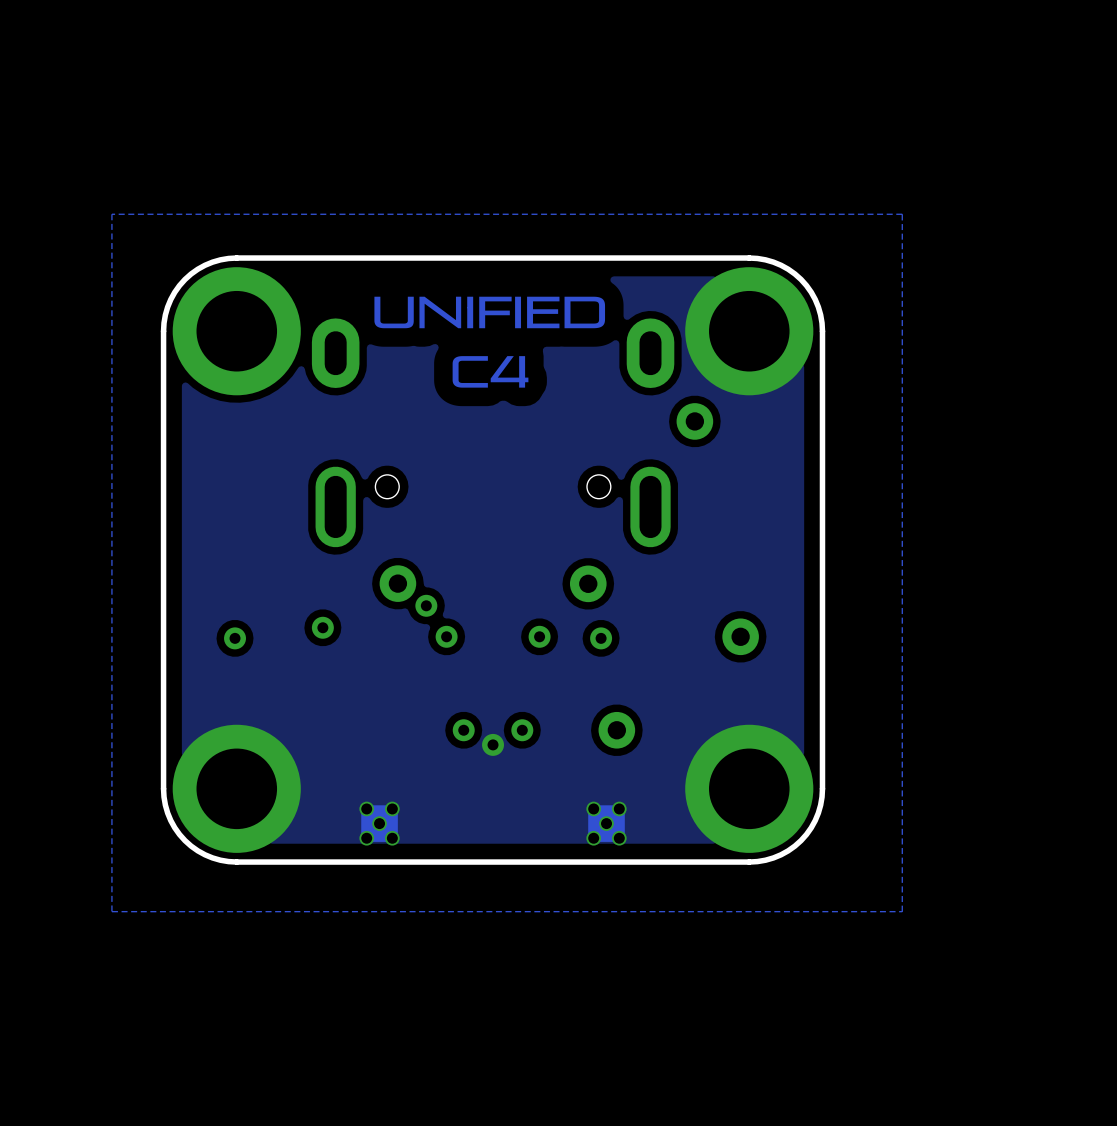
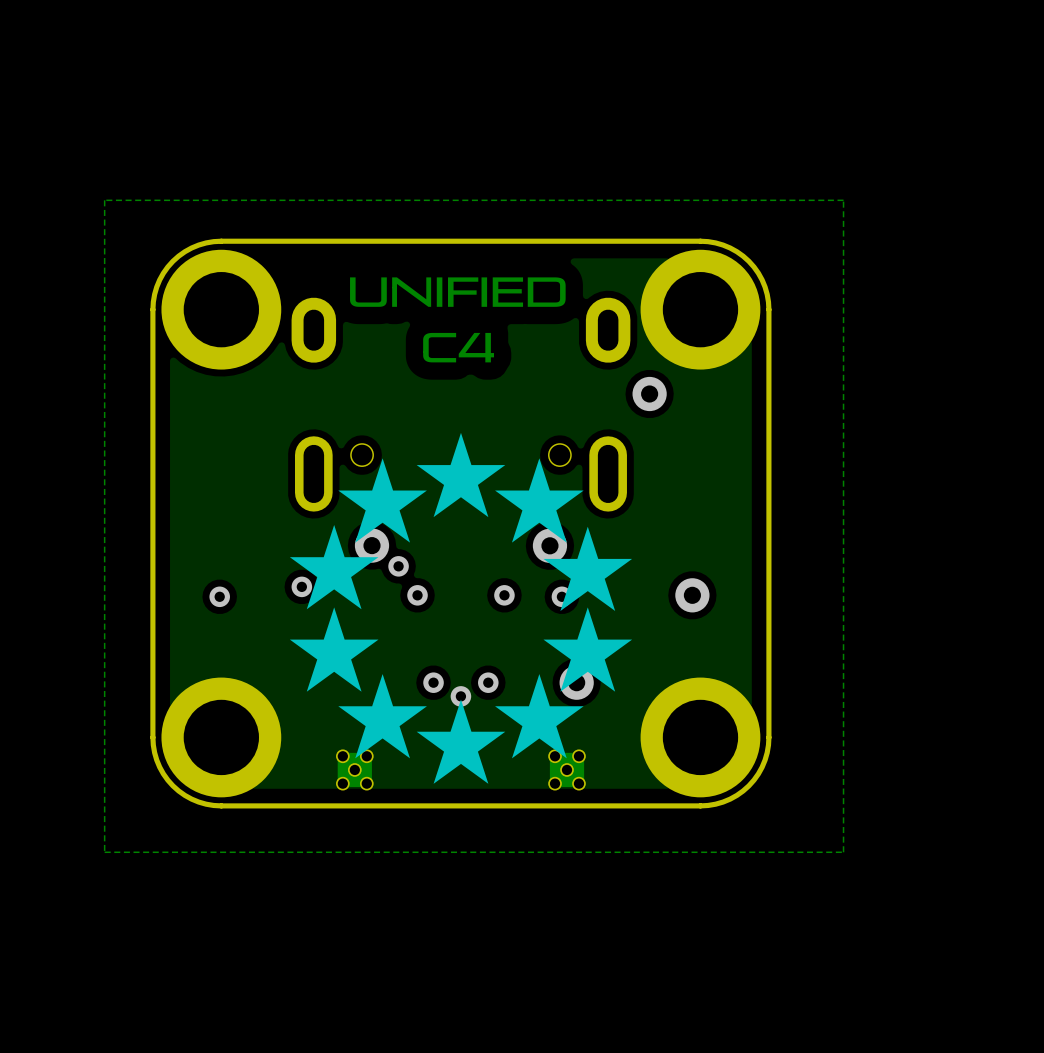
drawing: none -> [289, 432, 633, 784]

